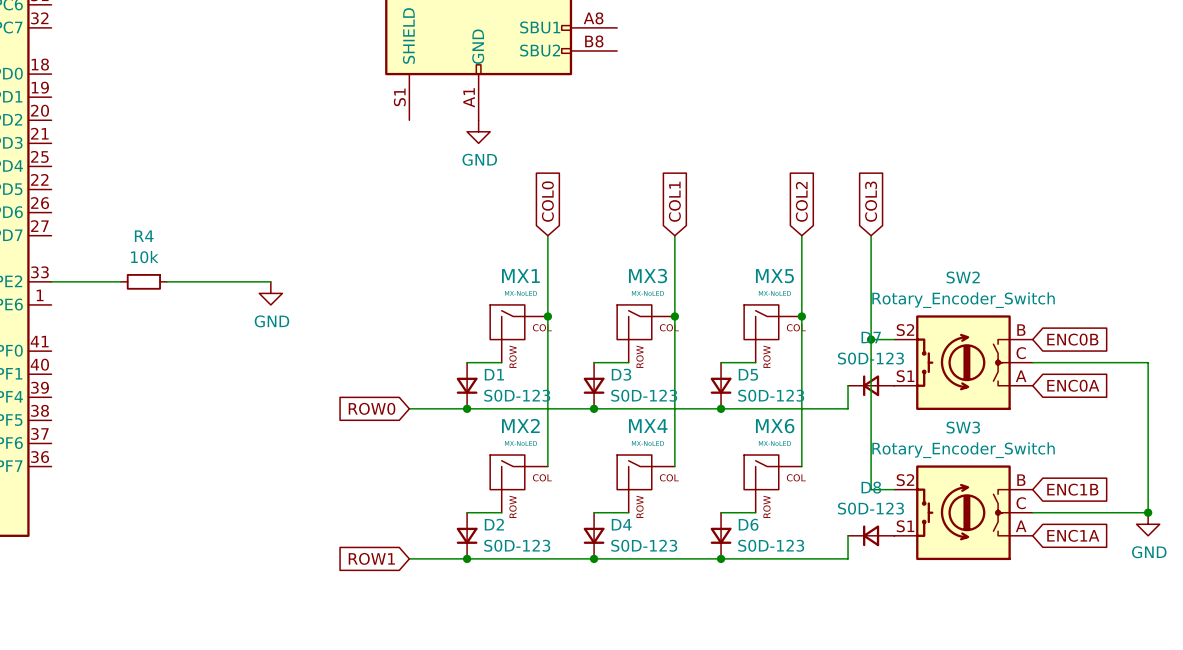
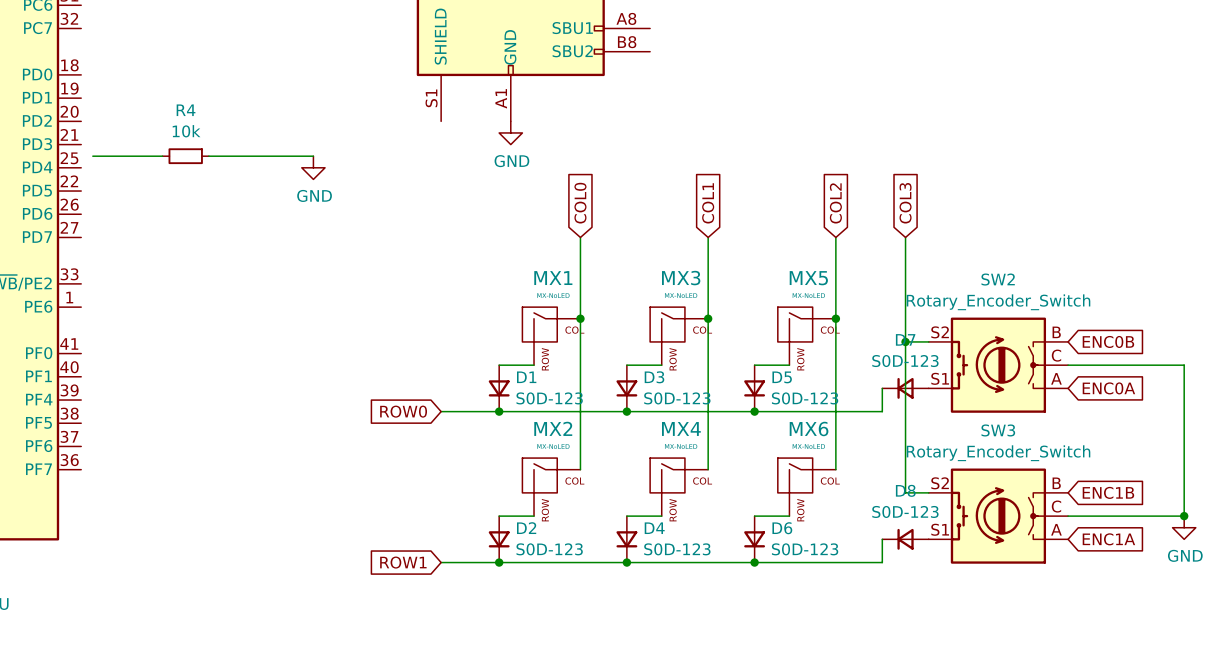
wire: (51, 281) (120, 281) -> (92, 156) (162, 156)
R4 position: (143, 281) -> (185, 156)
wire: (166, 281) (270, 281) -> (208, 156) (313, 156)
power symbol position: GND (270, 293) -> GND (313, 167)

